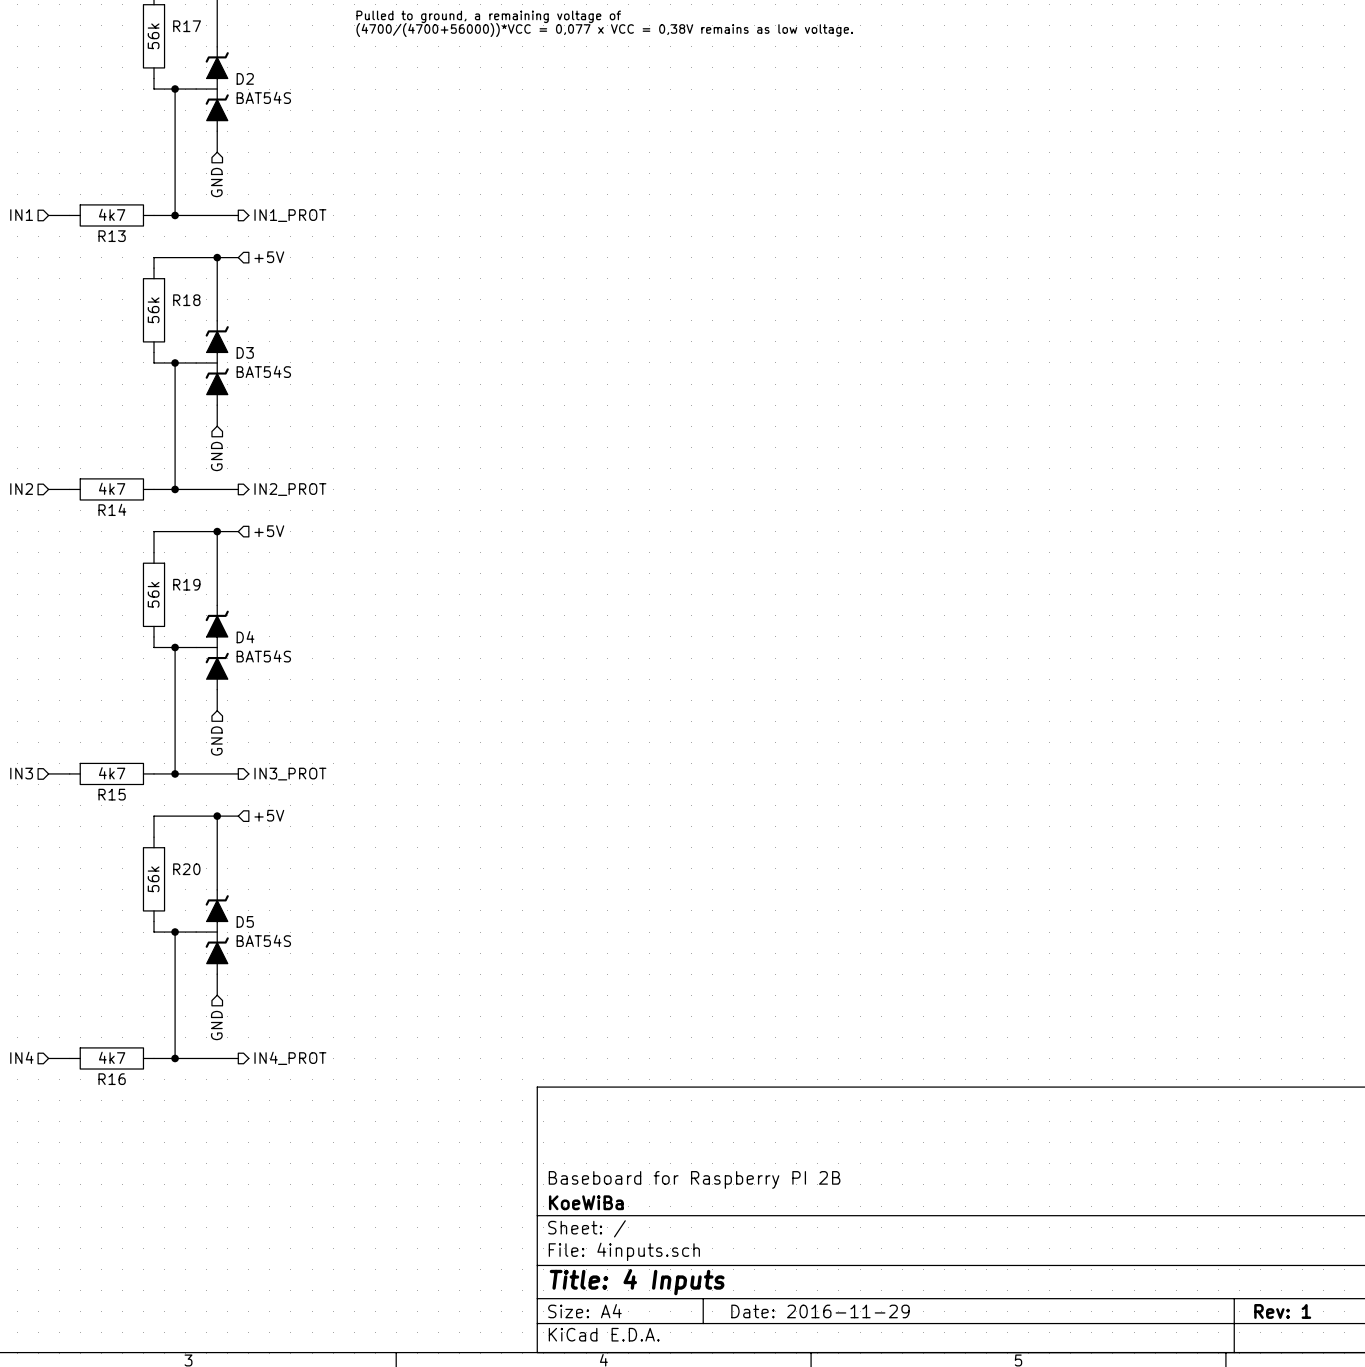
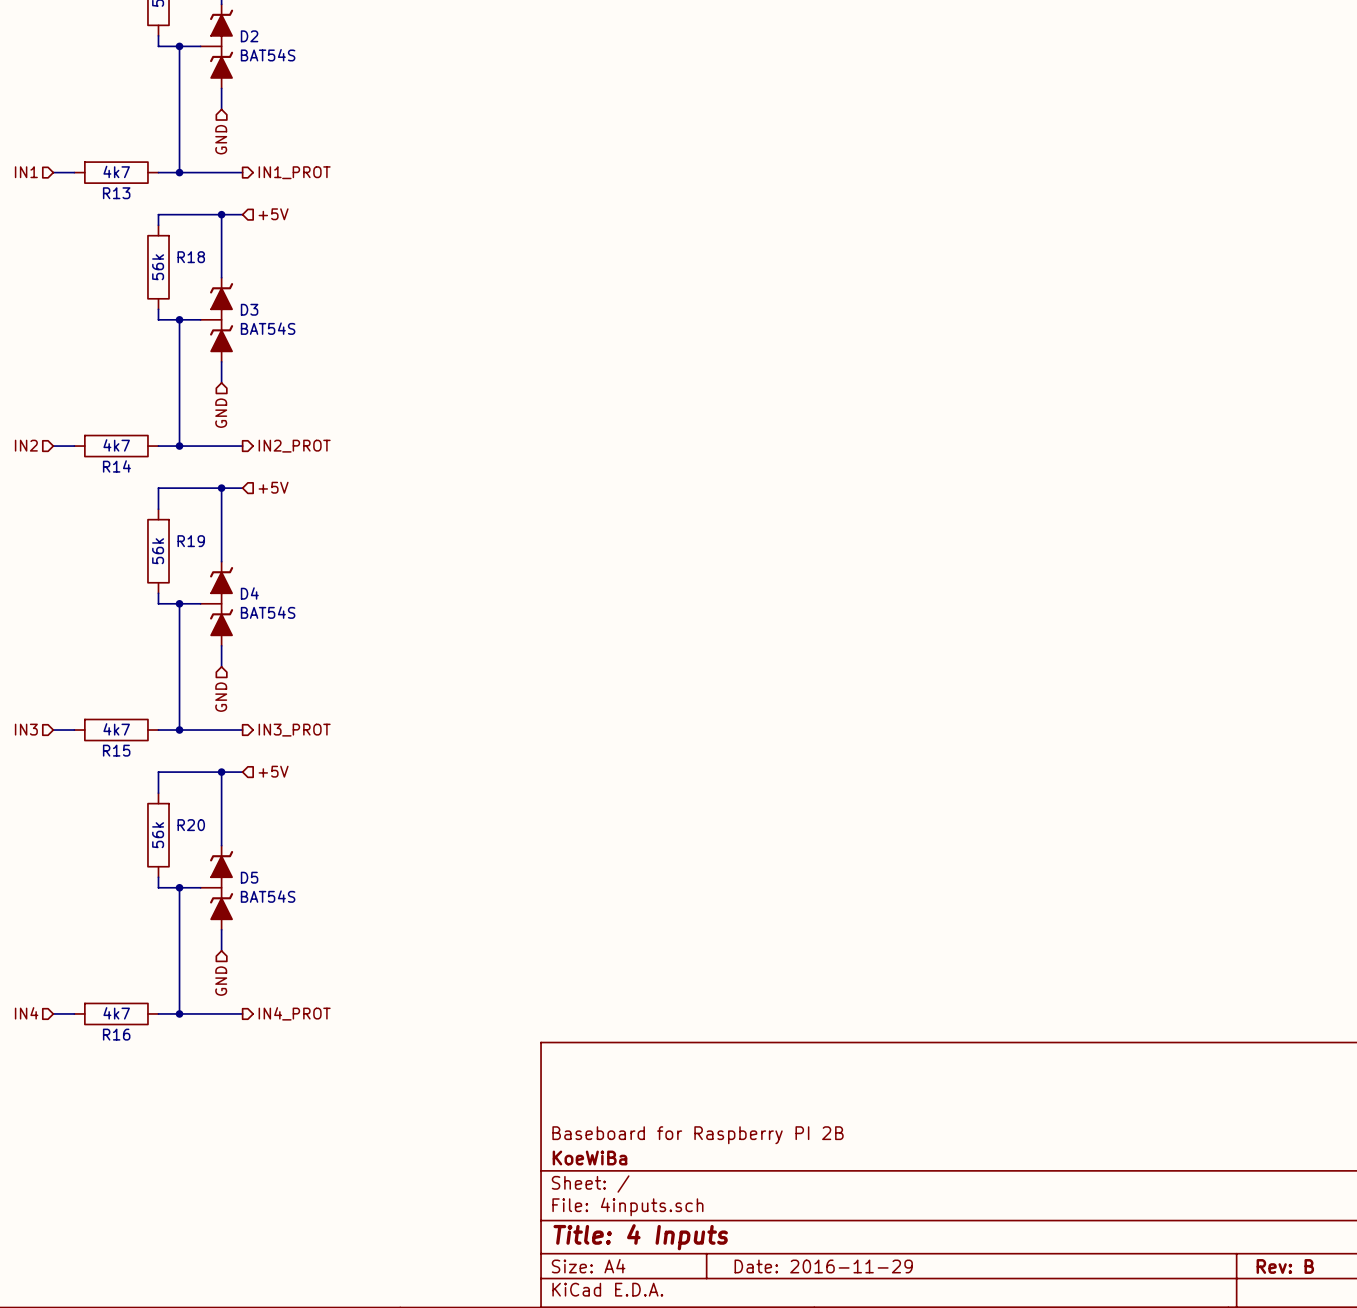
title block: Rev: 1 (1282, 1311) -> Rev: B (1285, 1266)

